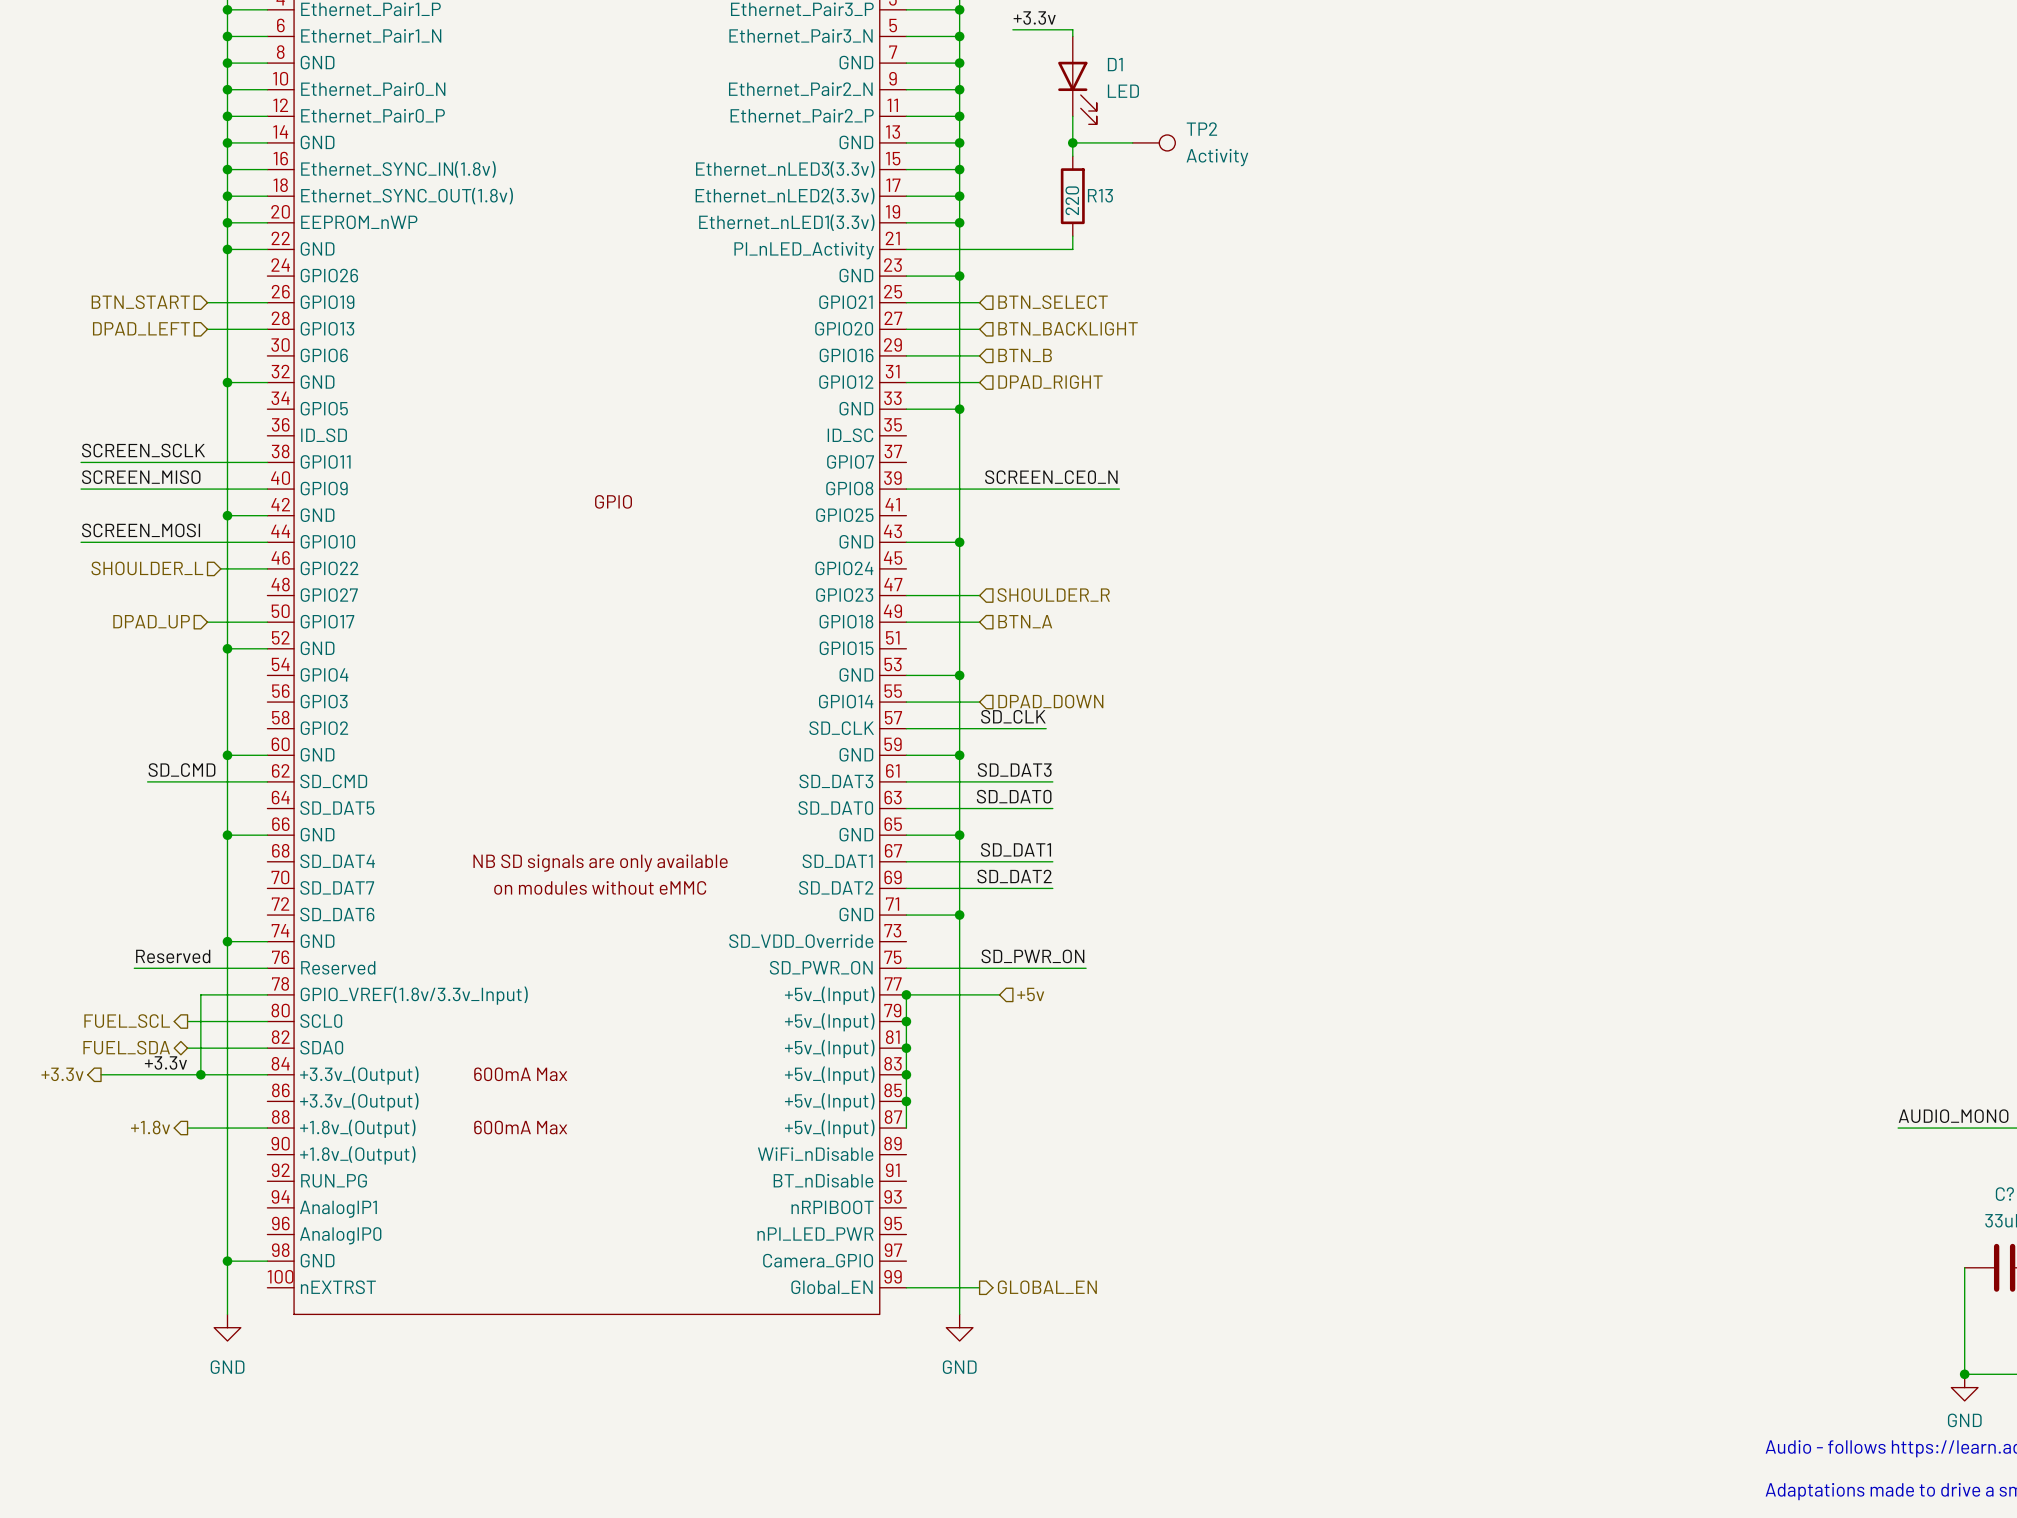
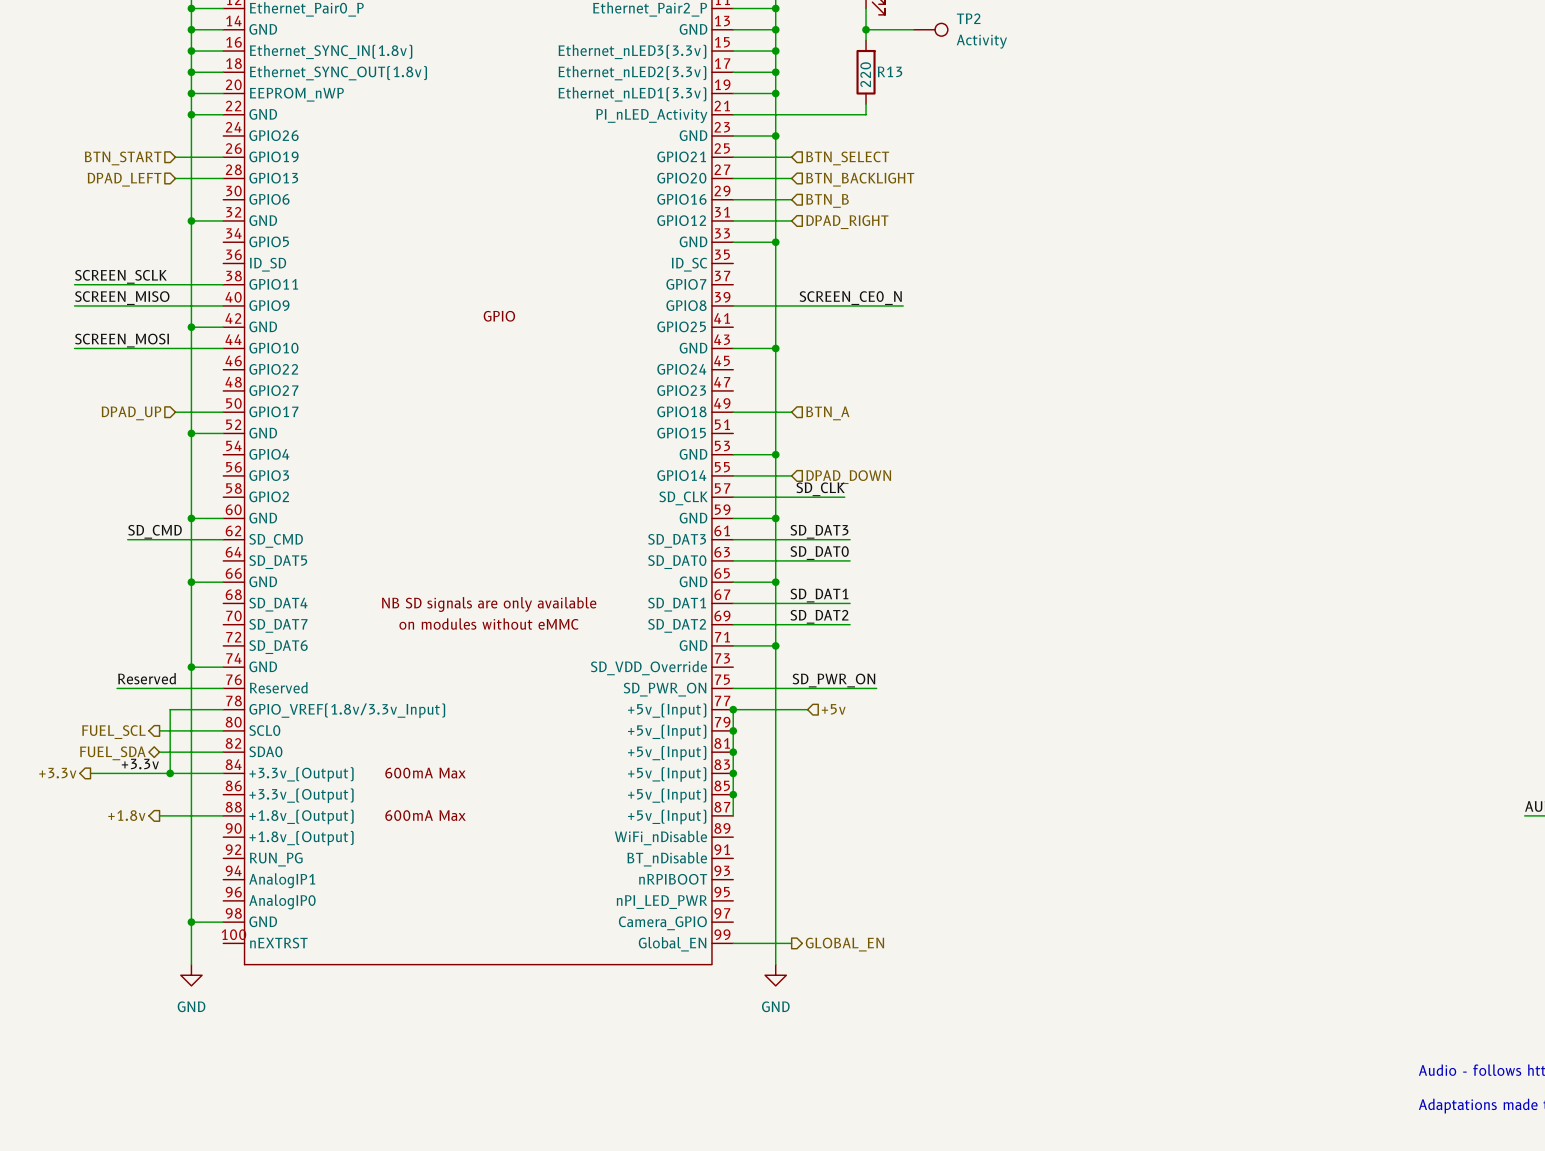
hierarchical label: SHOULDER_L (147, 568) -> none
wire: (220, 568) (267, 568) -> none
wire: (906, 595) (979, 595) -> none
hierarchical label: SHOULDER_R (1053, 595) -> none

